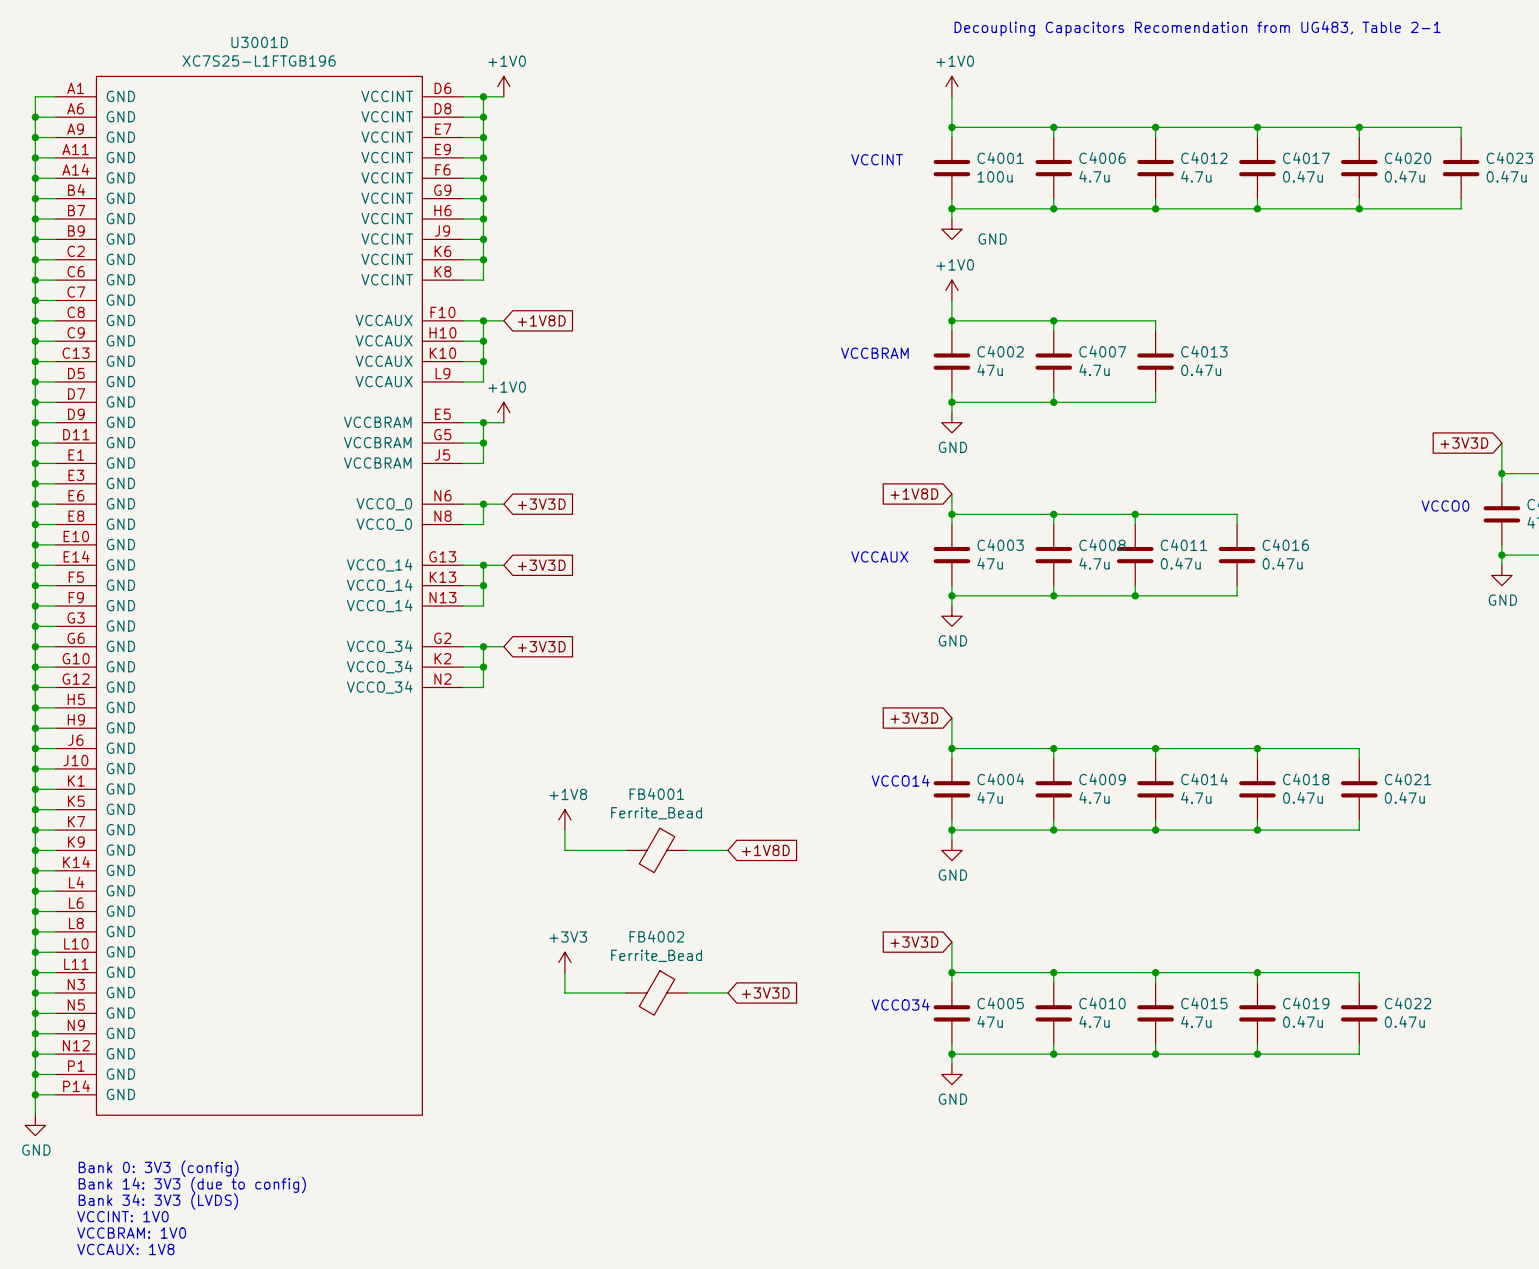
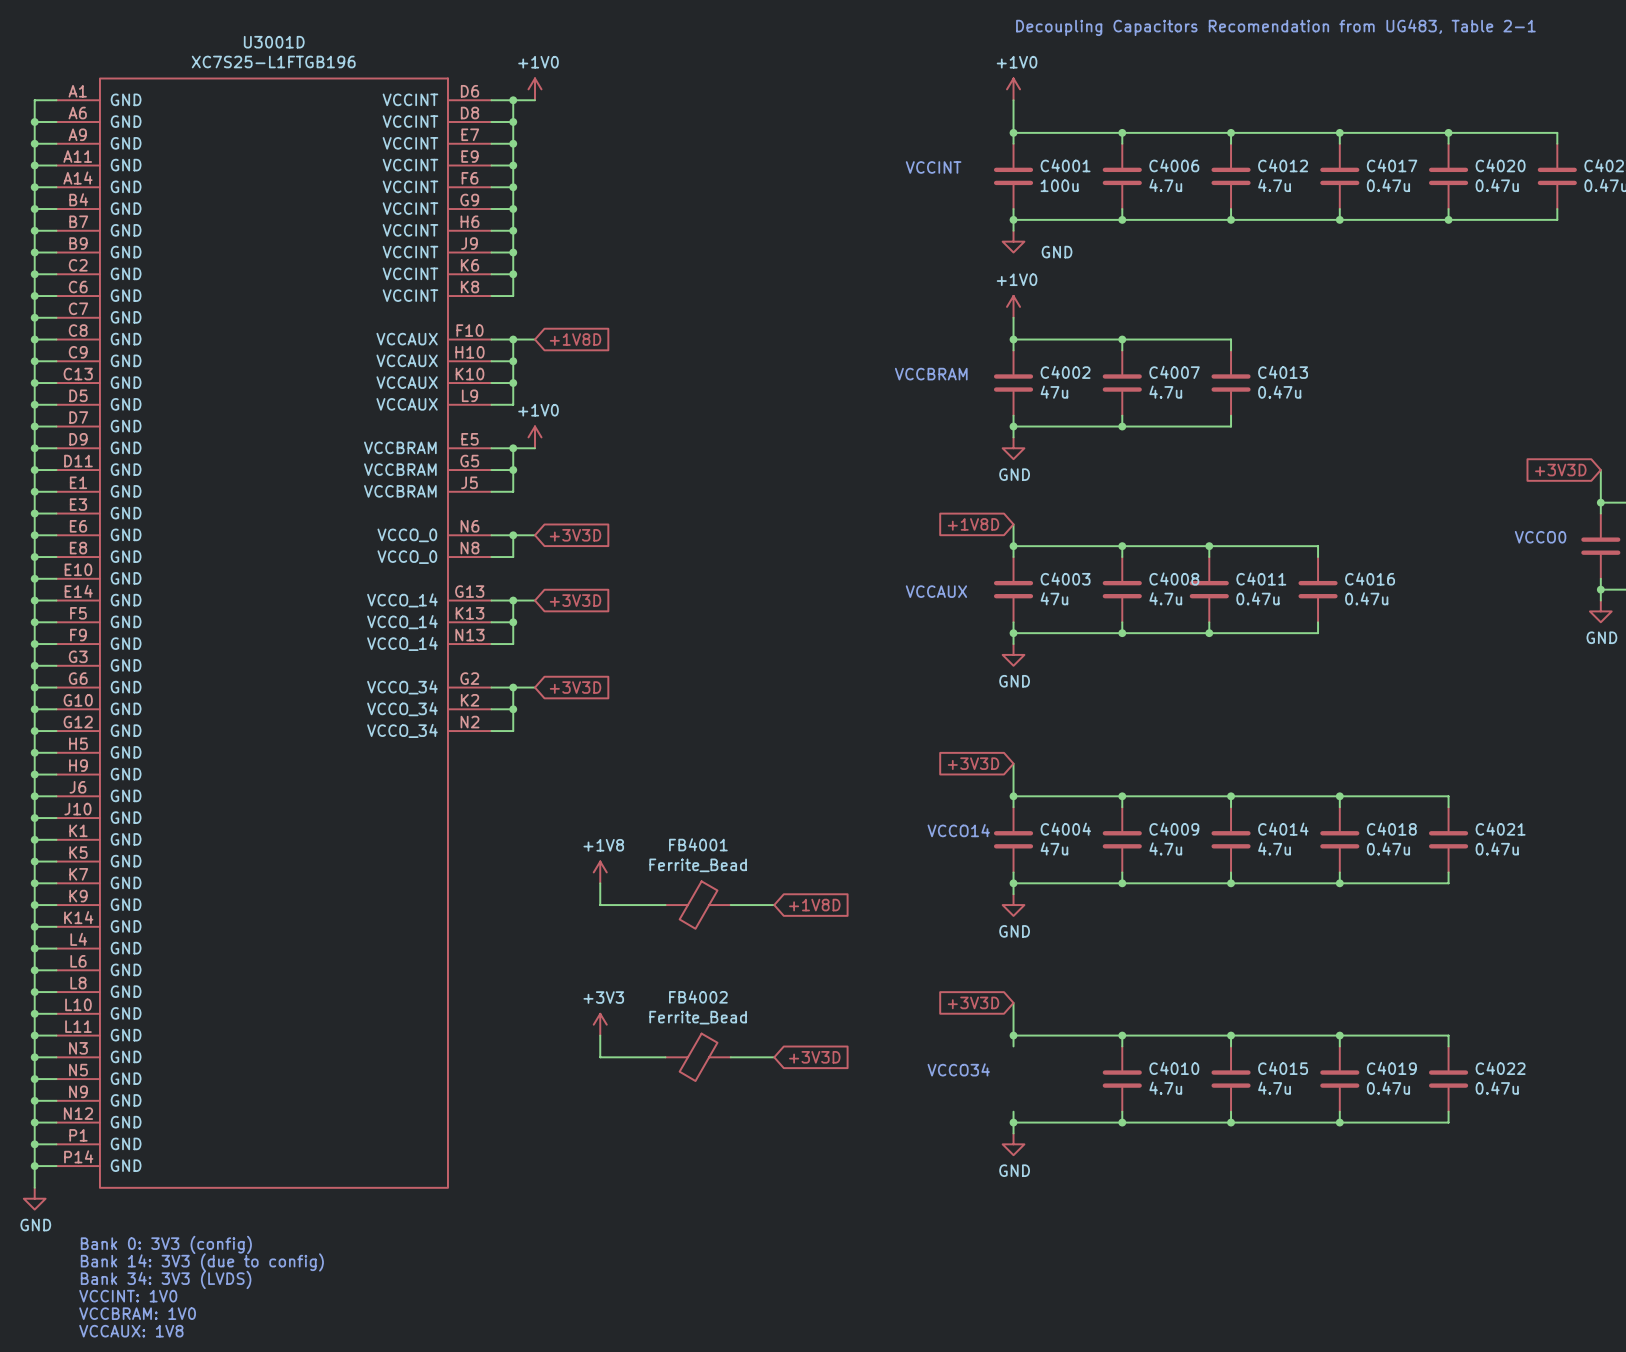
C4005: 47u (951, 1013) -> none

